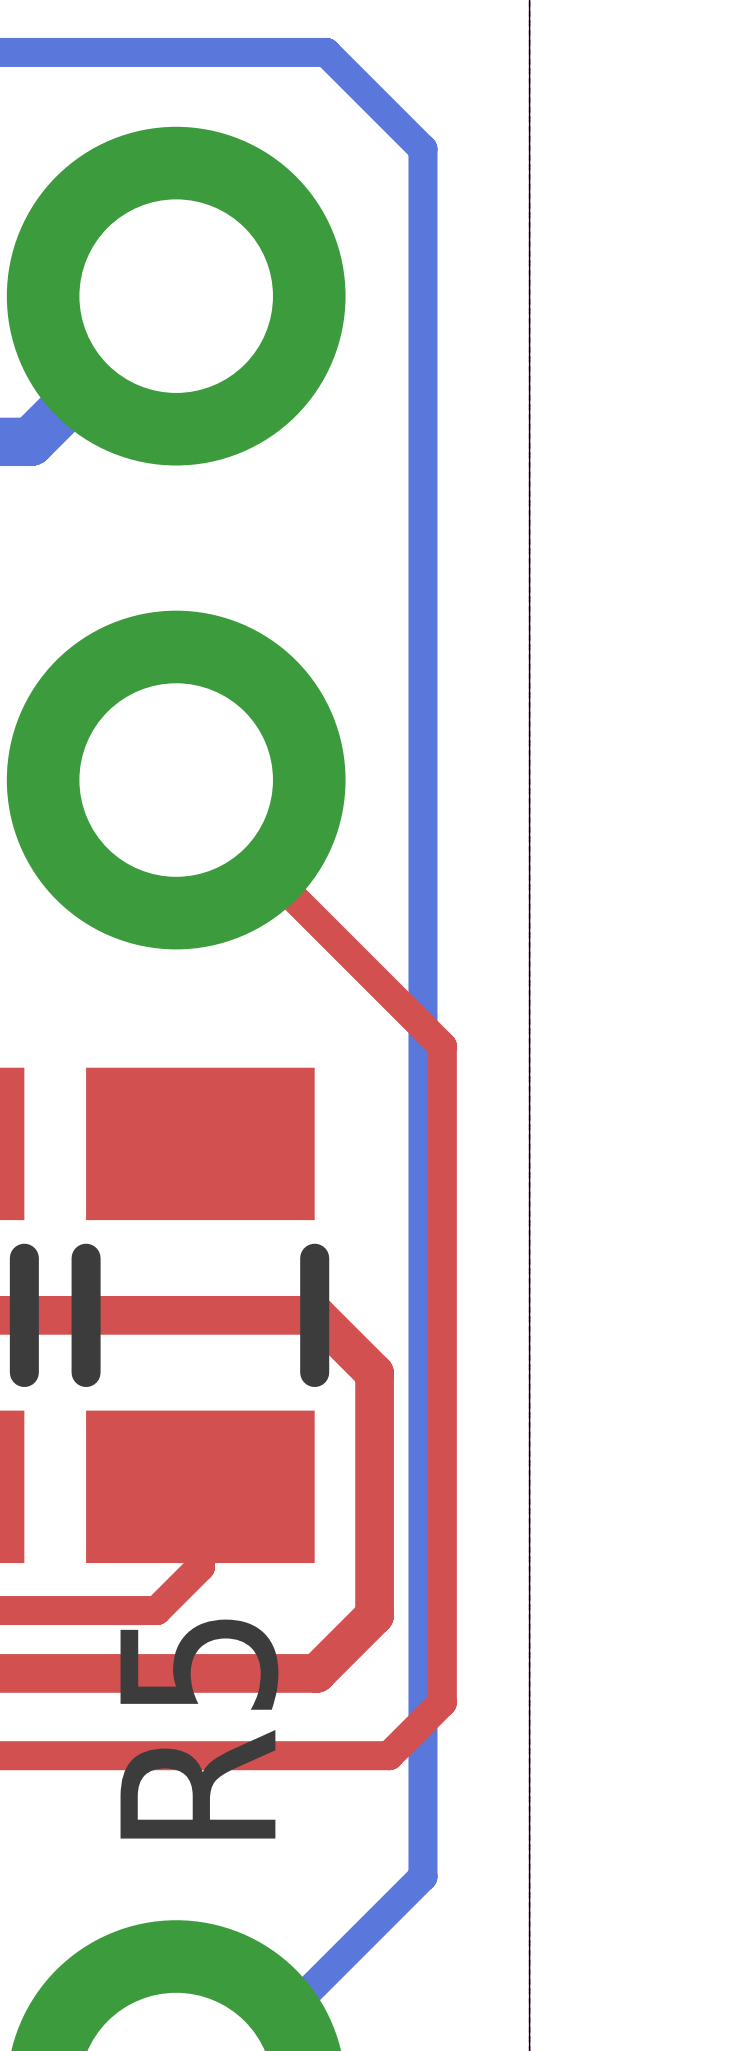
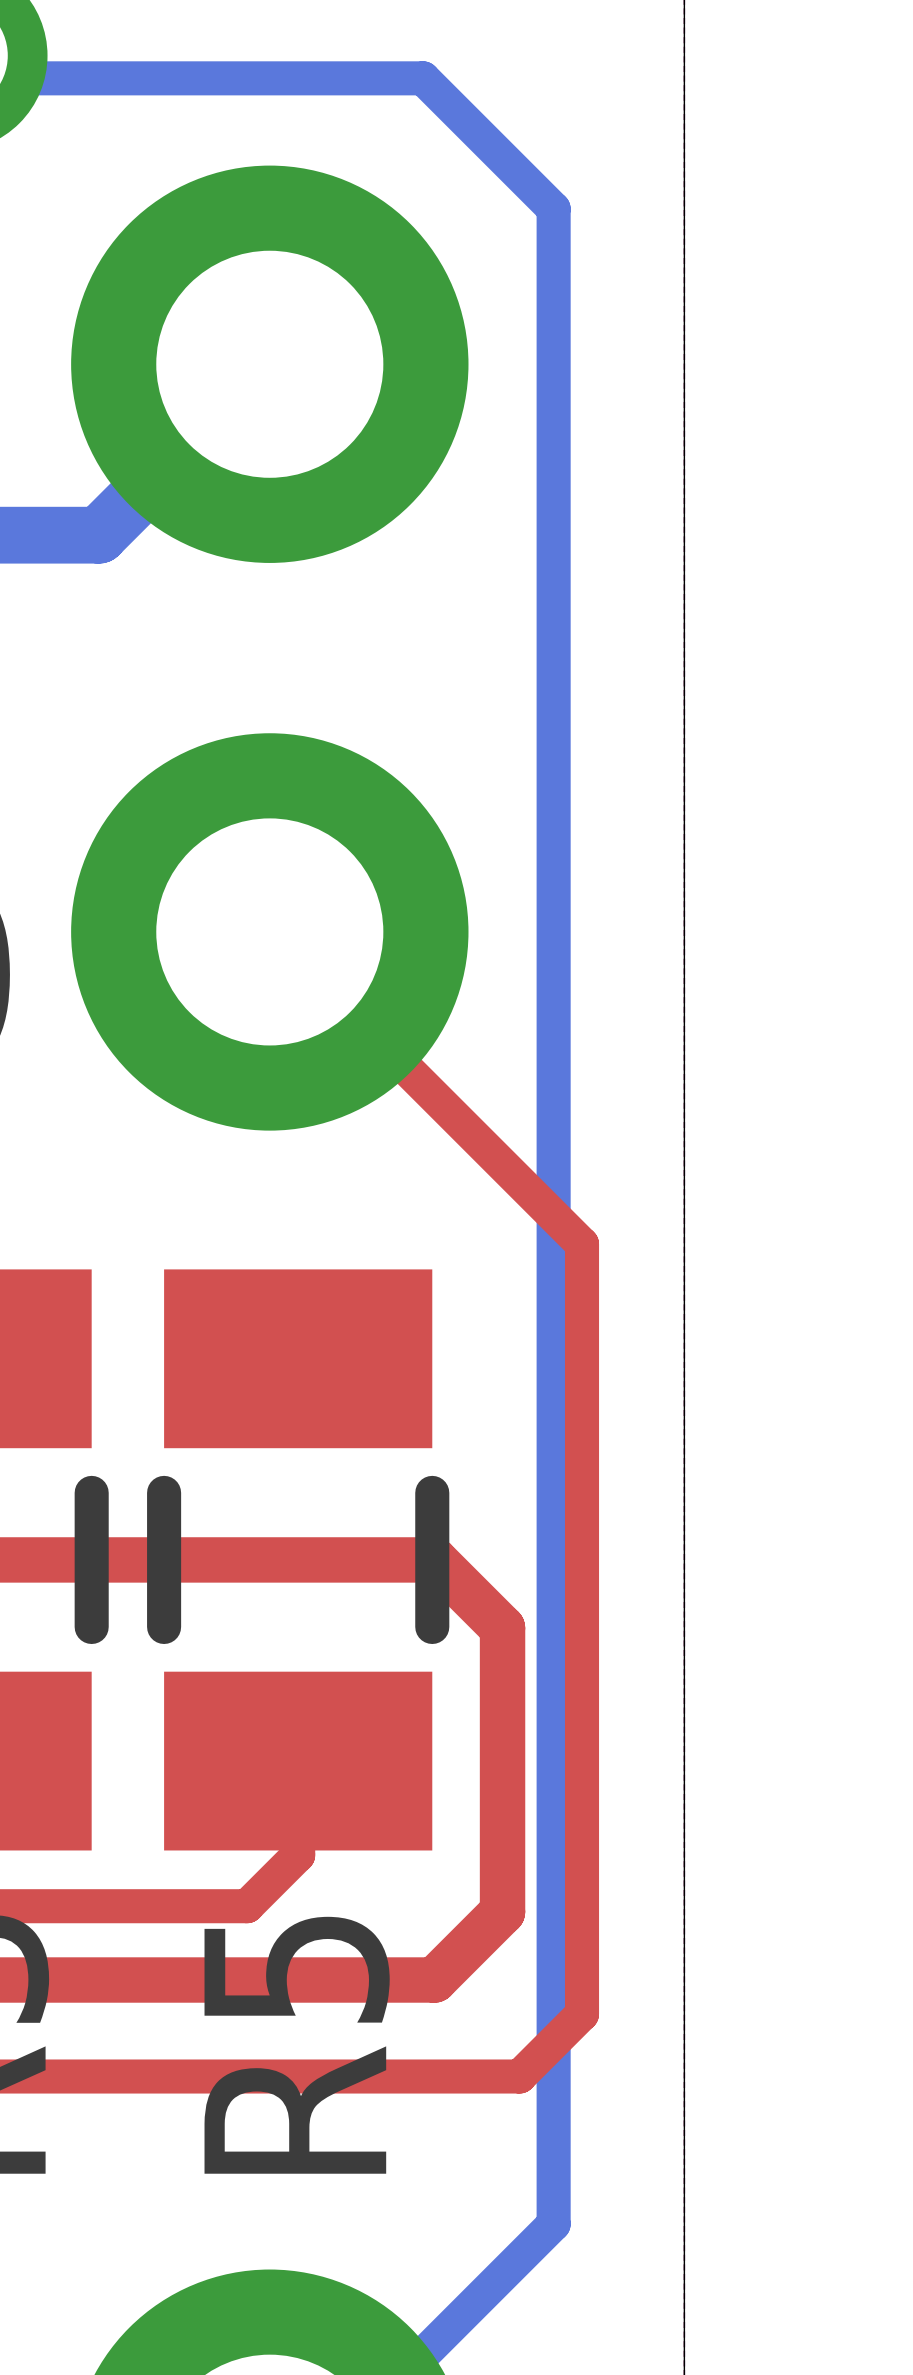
bottom track: (306, 52) (326, 52) (422, 149) (422, 1876) (418, 1881) -> (423, 78) (553, 208) (553, 2224)

